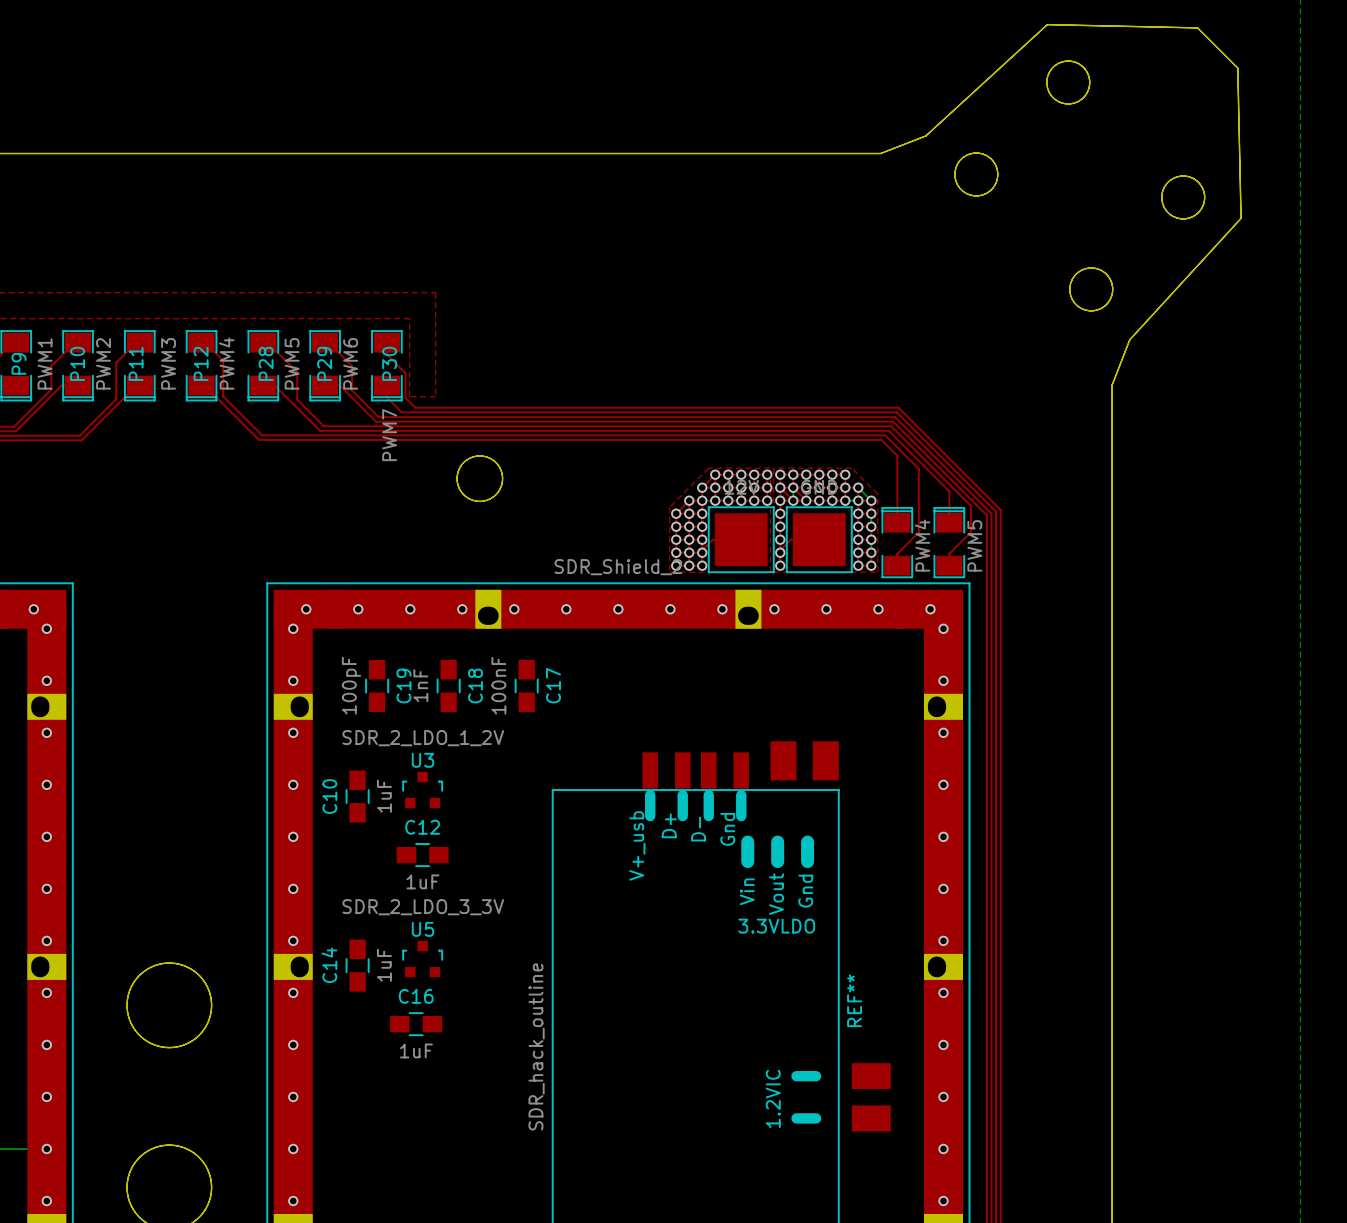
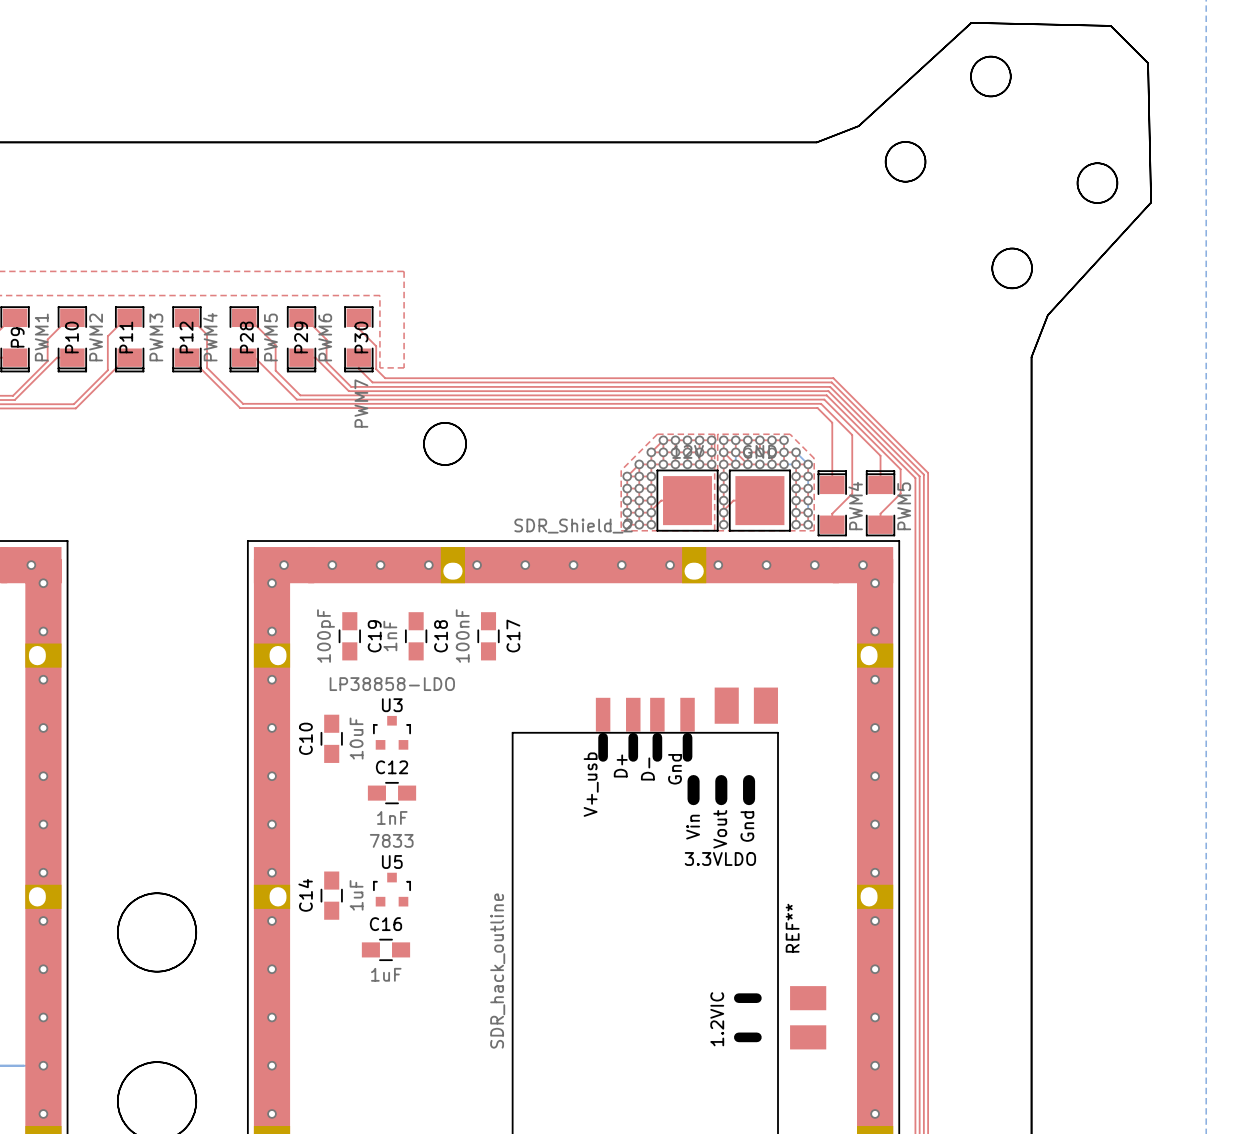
U3 value: SDR_2_LDO_1_2V (423, 738) -> LP38858-LDO (392, 684)
C10 value: 1uF (384, 796) -> 10uF (356, 738)
C12 value: 1uF (422, 881) -> 1nF (392, 817)
U5 value: SDR_2_LDO_3_3V (423, 907) -> 7833 (391, 840)

